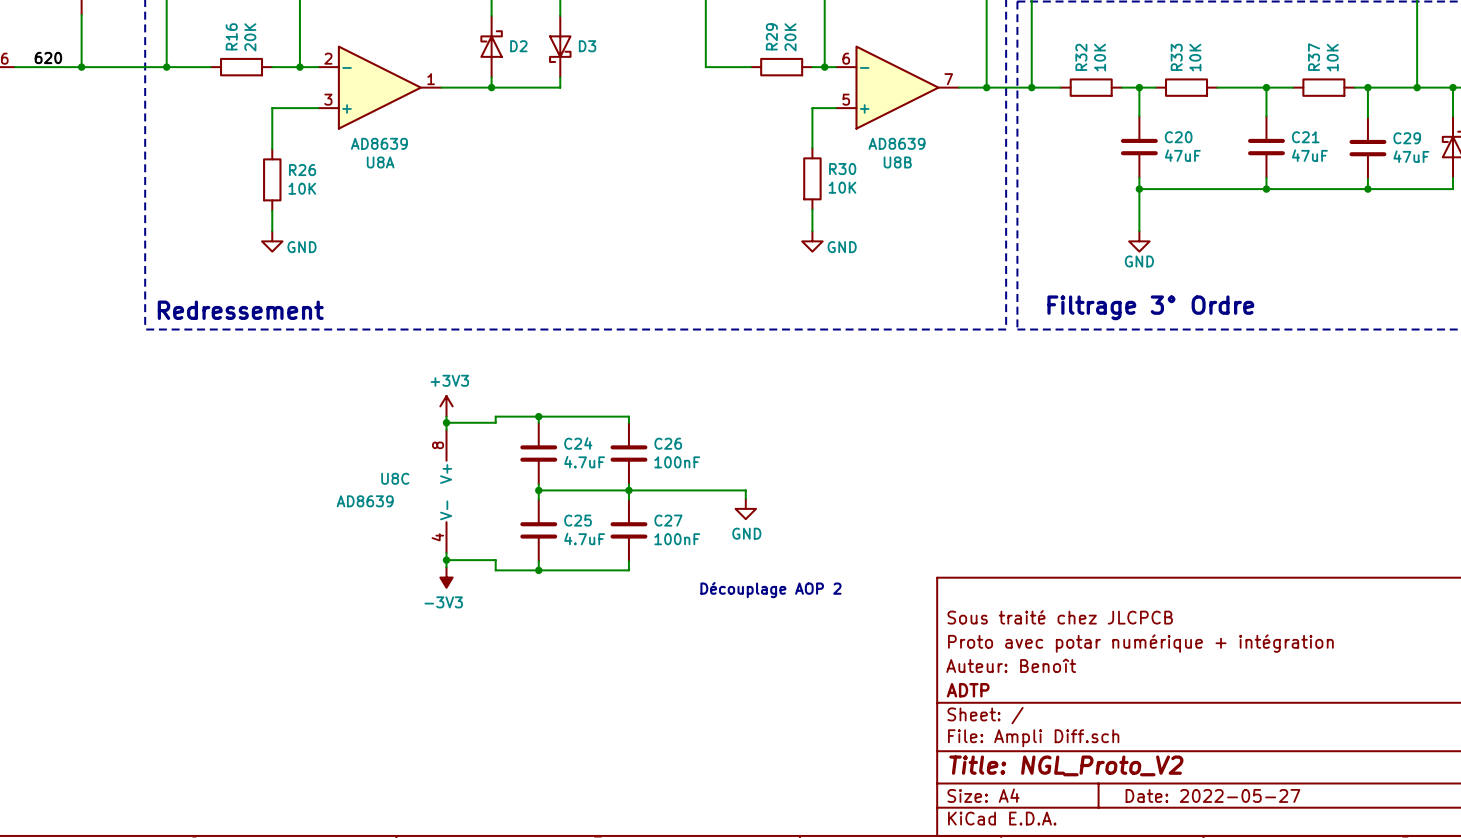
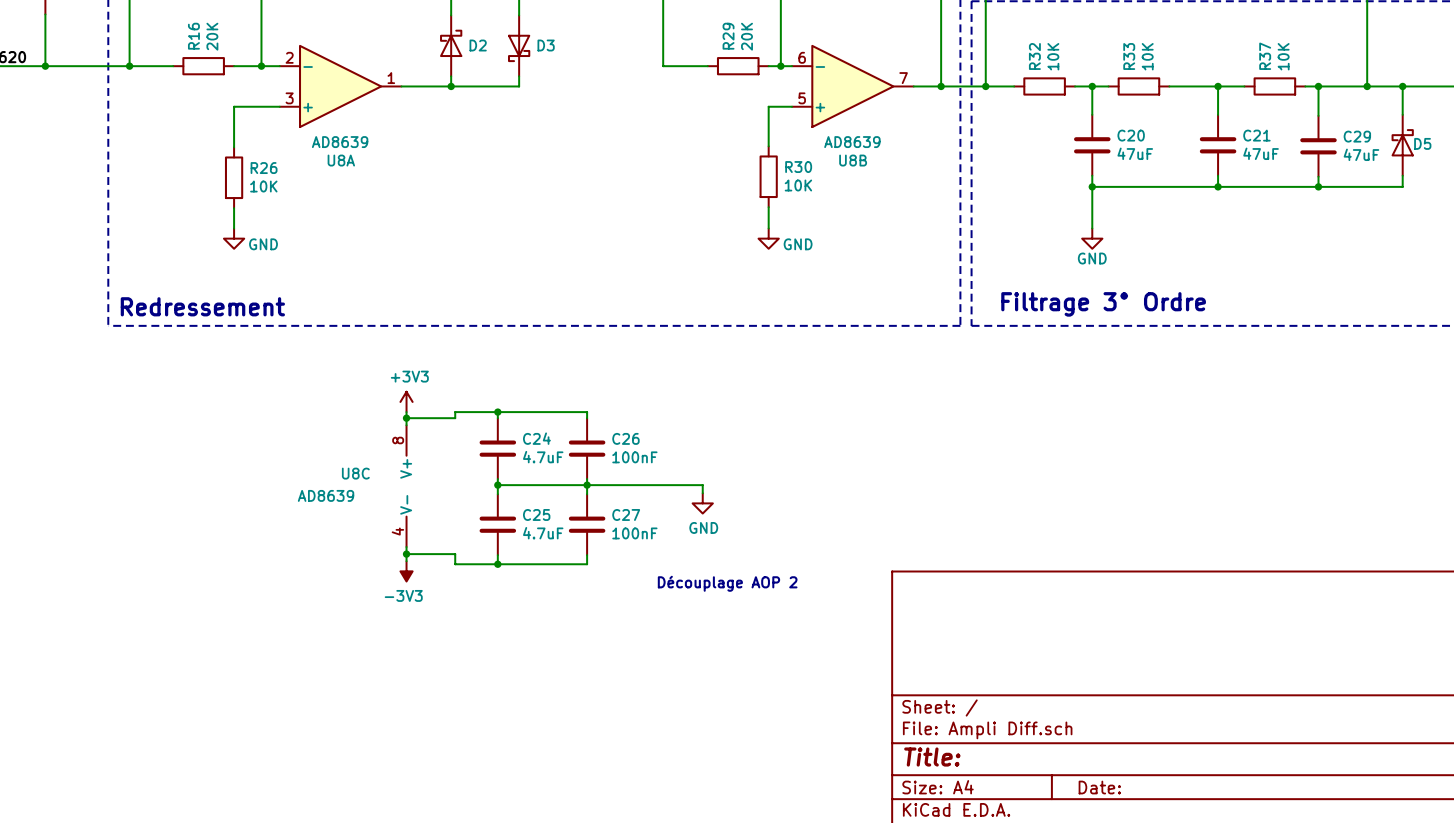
title block: Sous traité chez JLCPCB (1060, 617) -> none
title block: Proto avec potar numérique + intégration (1140, 643) -> none
title block: Auteur: Benoît (1011, 665) -> none
title block: ADTP (968, 690) -> none
title block: Title: NGL_Proto_V2 (1066, 765) -> Title: (932, 757)
title block: Date: 2022-05-27 (1212, 795) -> Date: (1099, 787)

